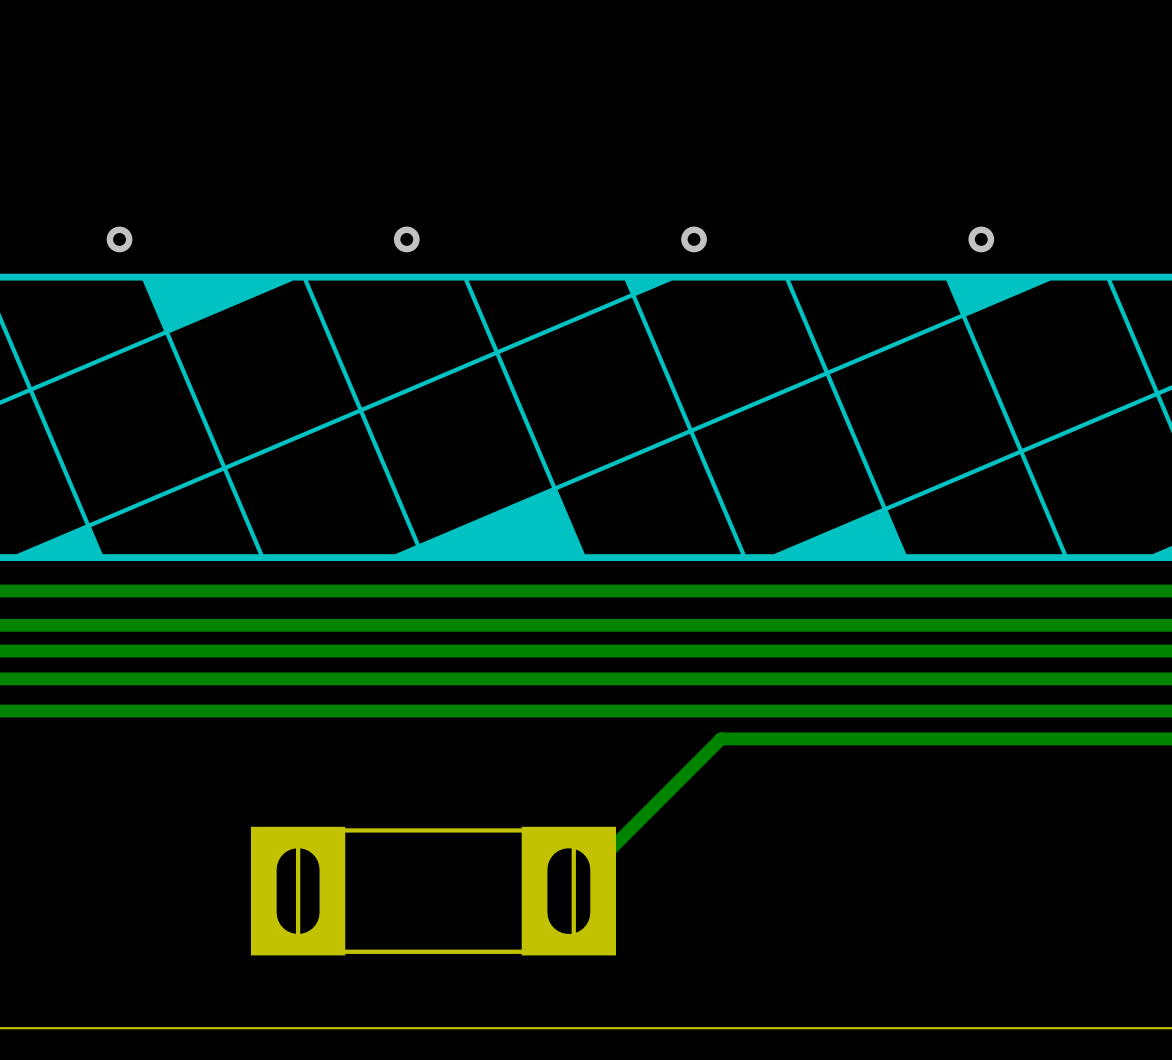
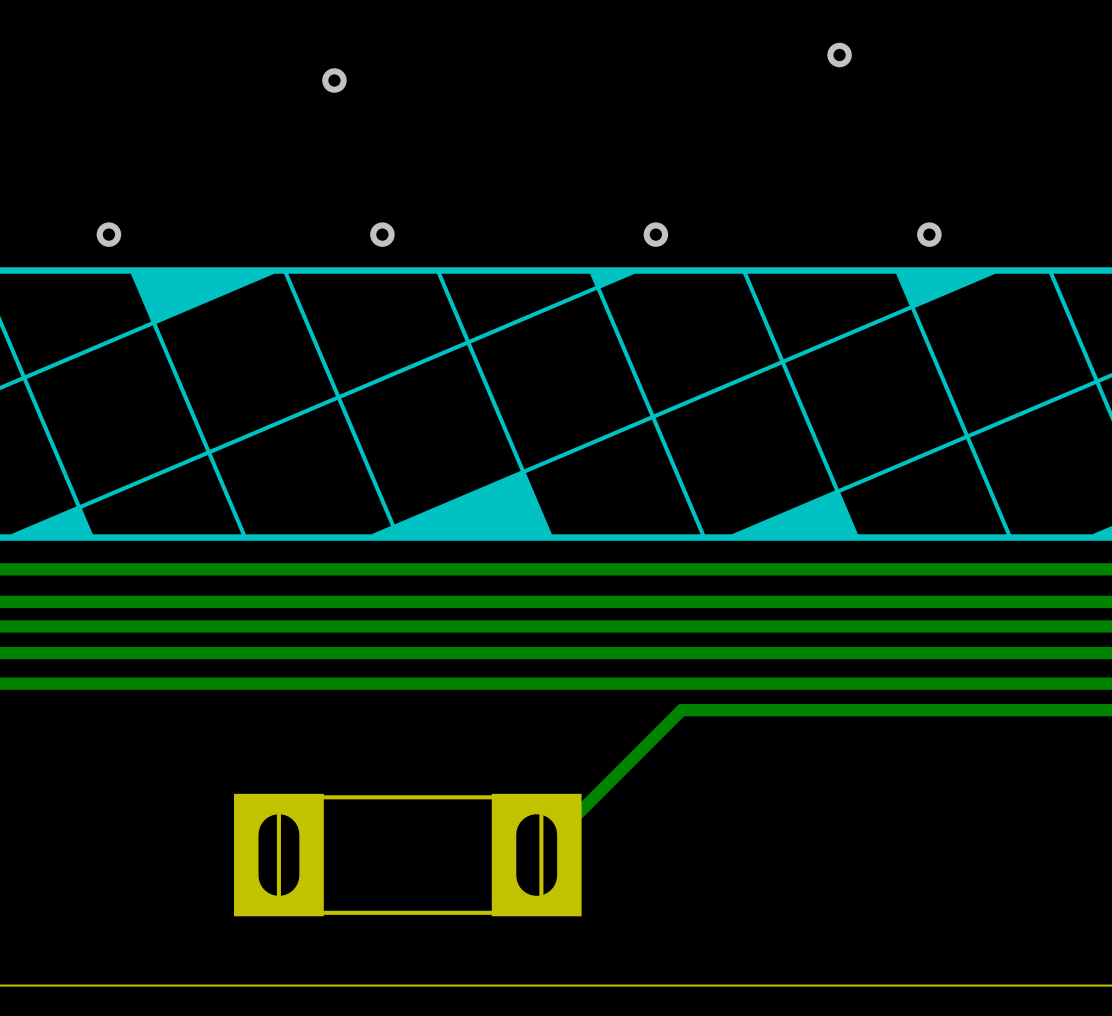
via: none -> (839, 55)
via: none -> (334, 80)

